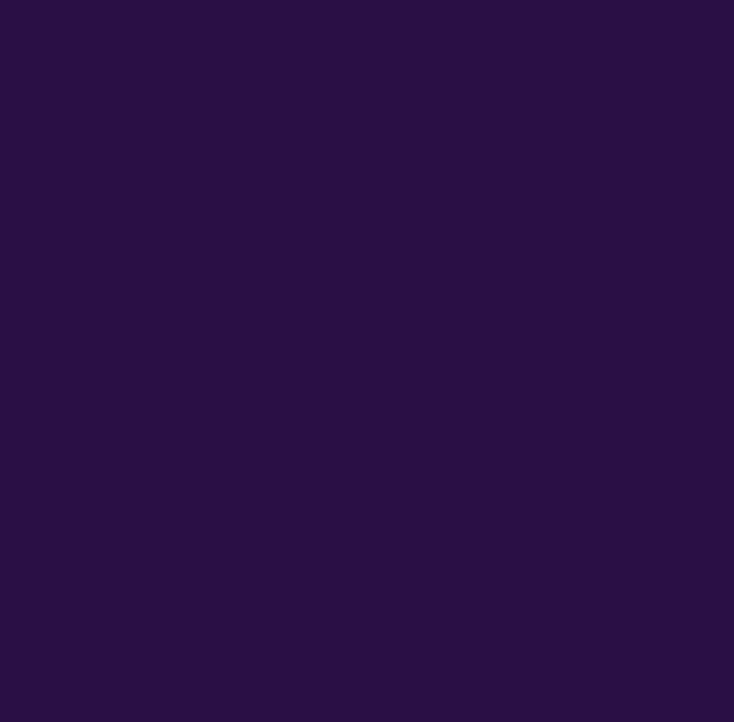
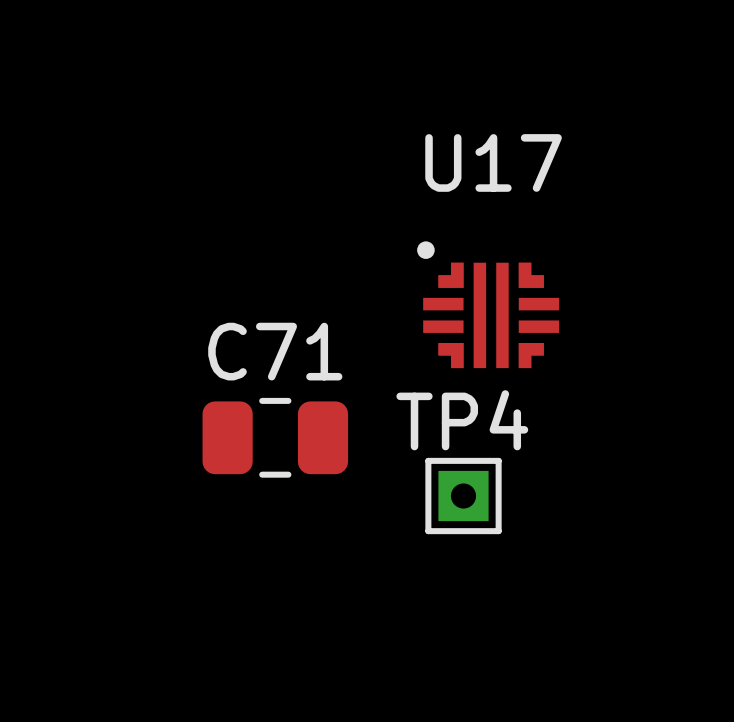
U17: none -> (488, 304)
C71: none -> (275, 437)
TP4: none -> (463, 496)

